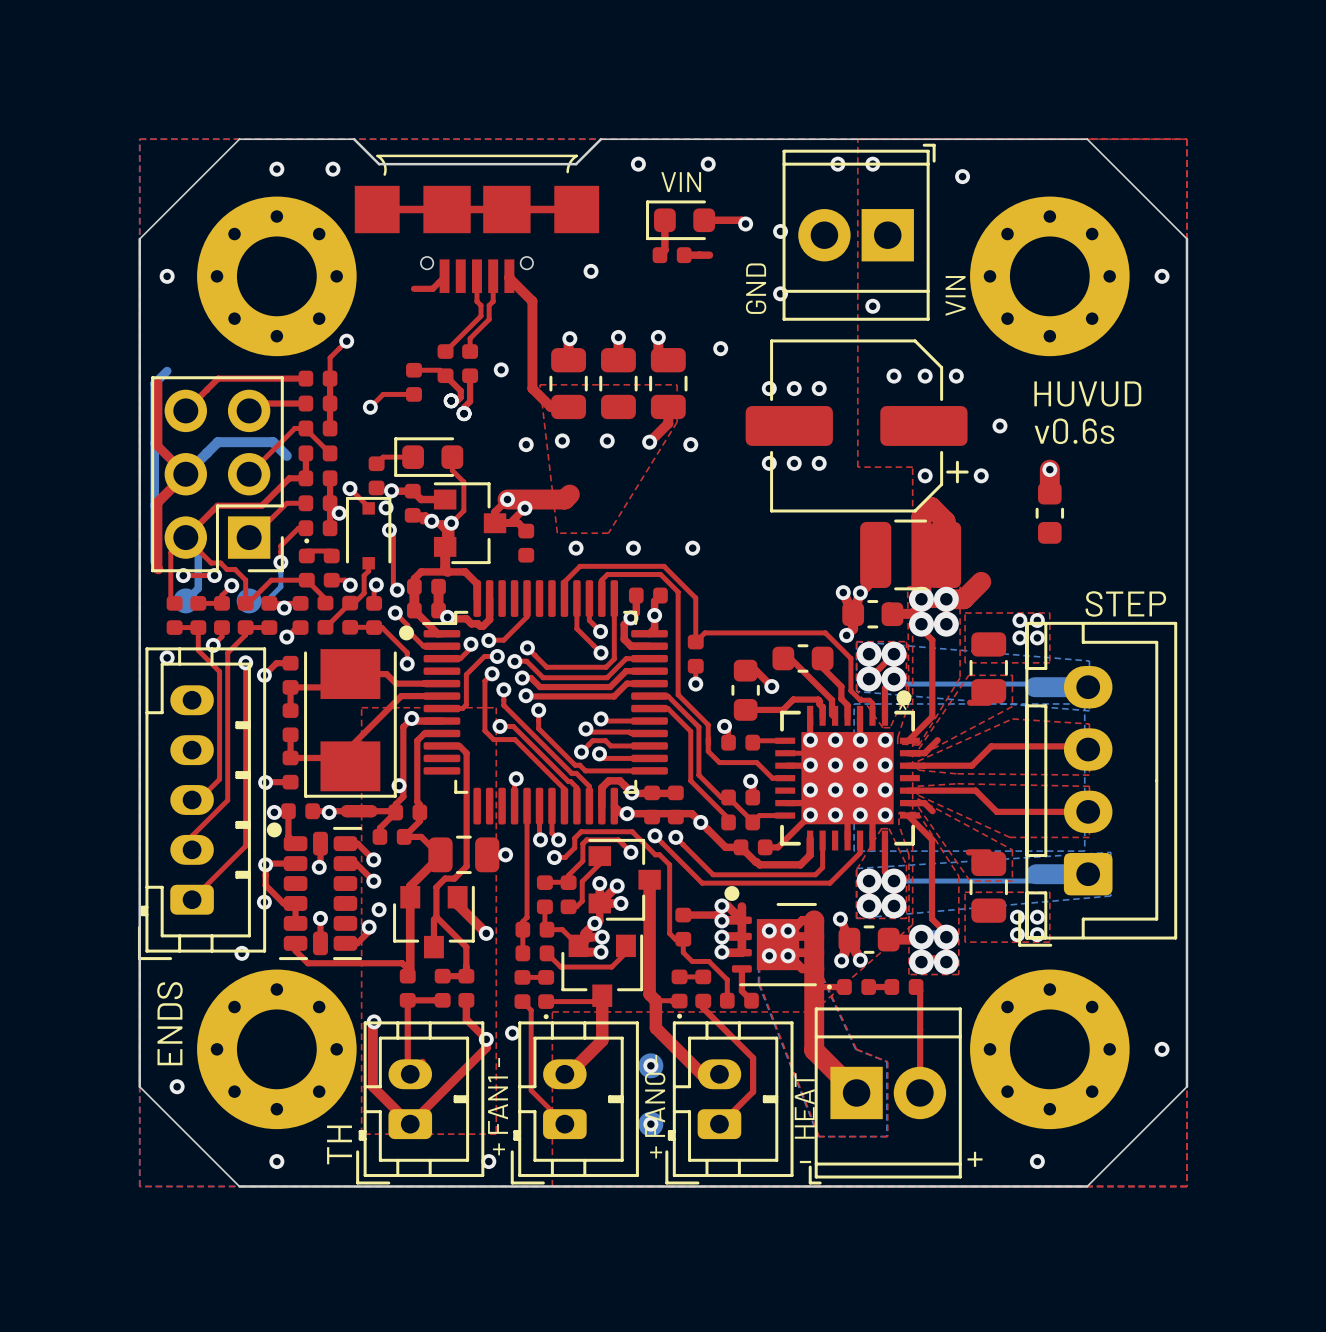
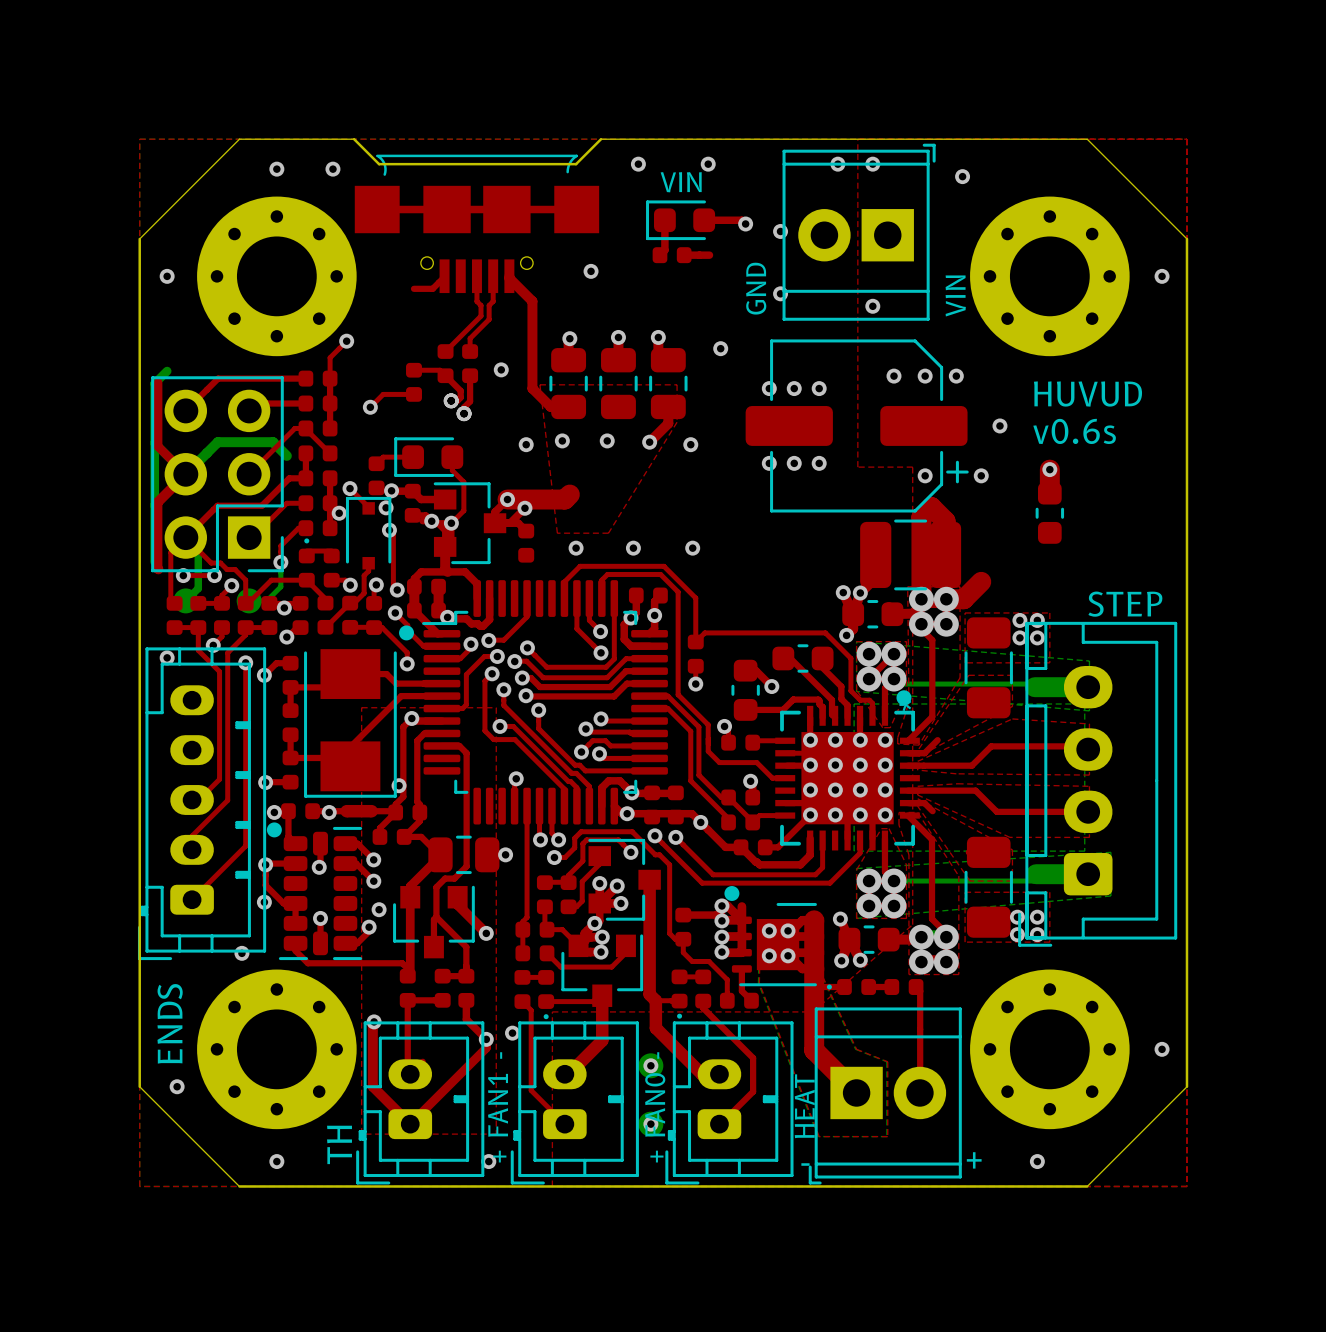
part footprint: [969, 632, 1008, 704] -> [964, 617, 1013, 719]
part footprint: [969, 851, 1008, 923] -> [964, 836, 1013, 938]

